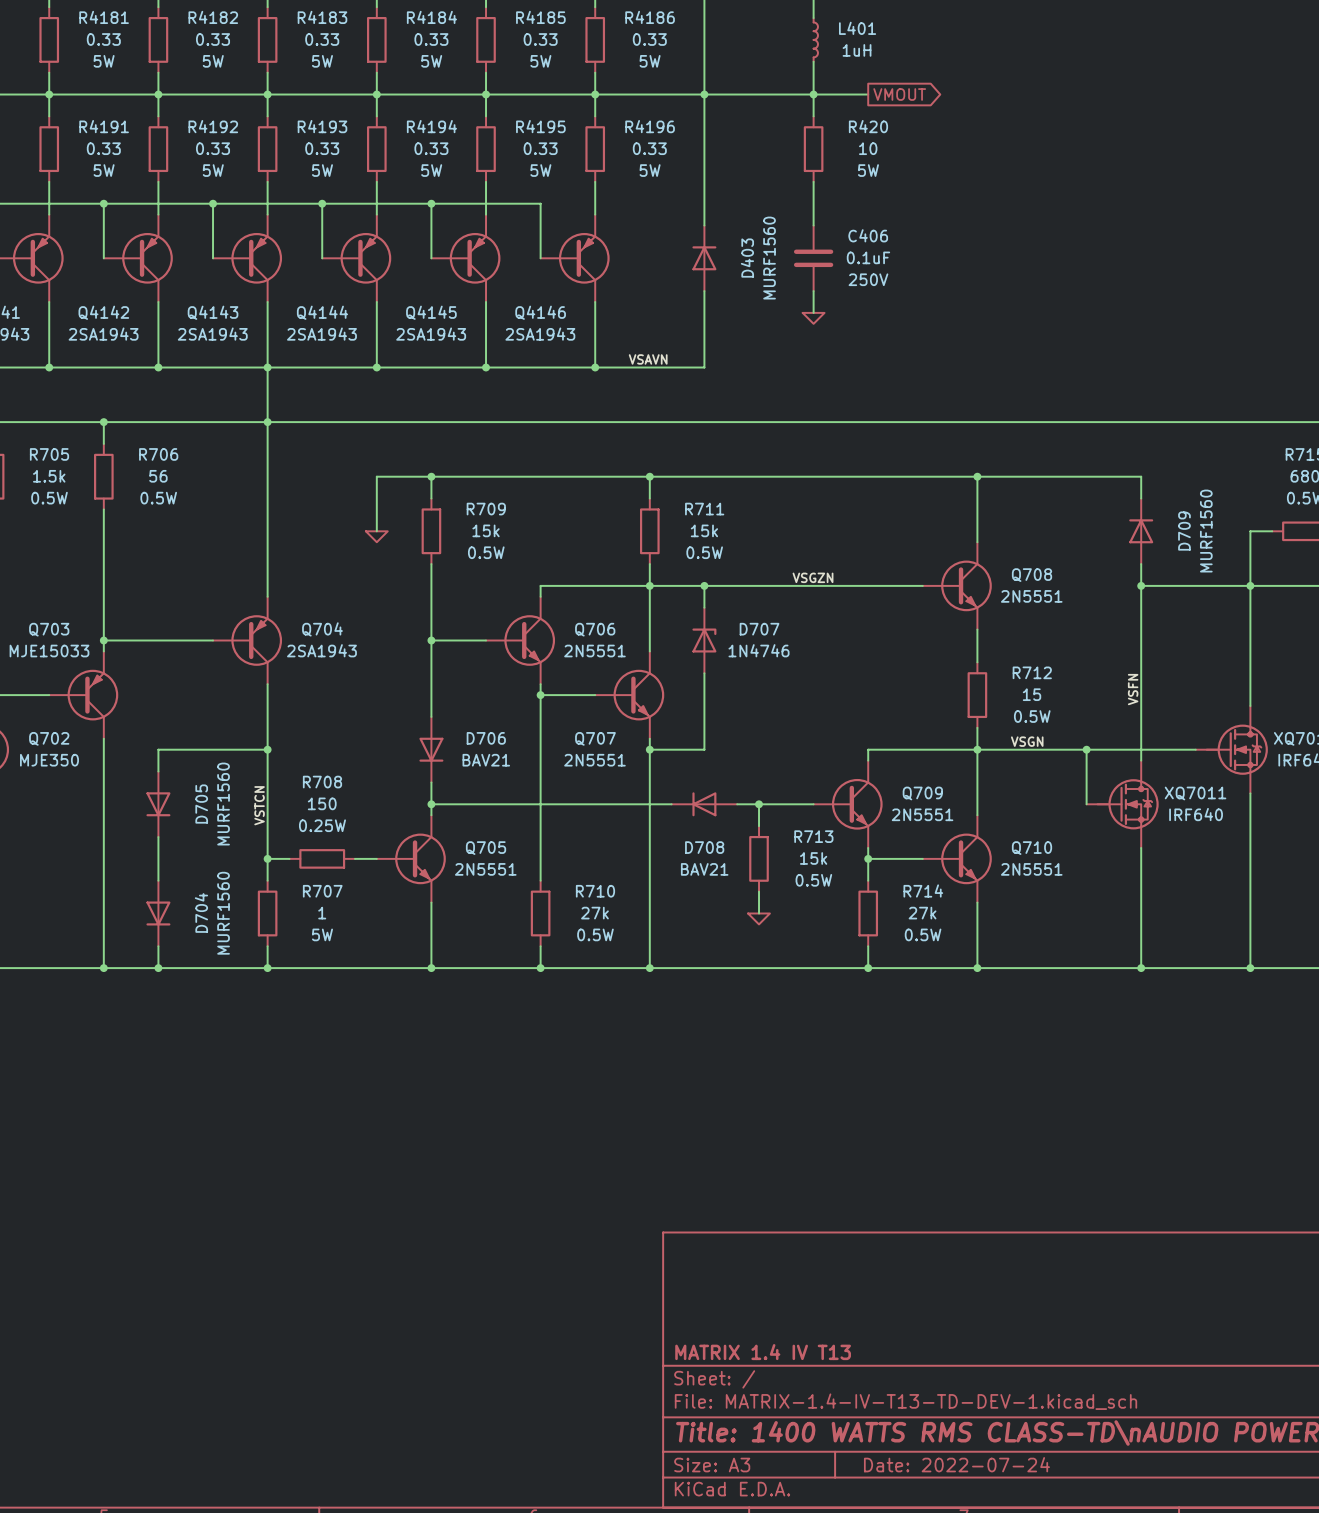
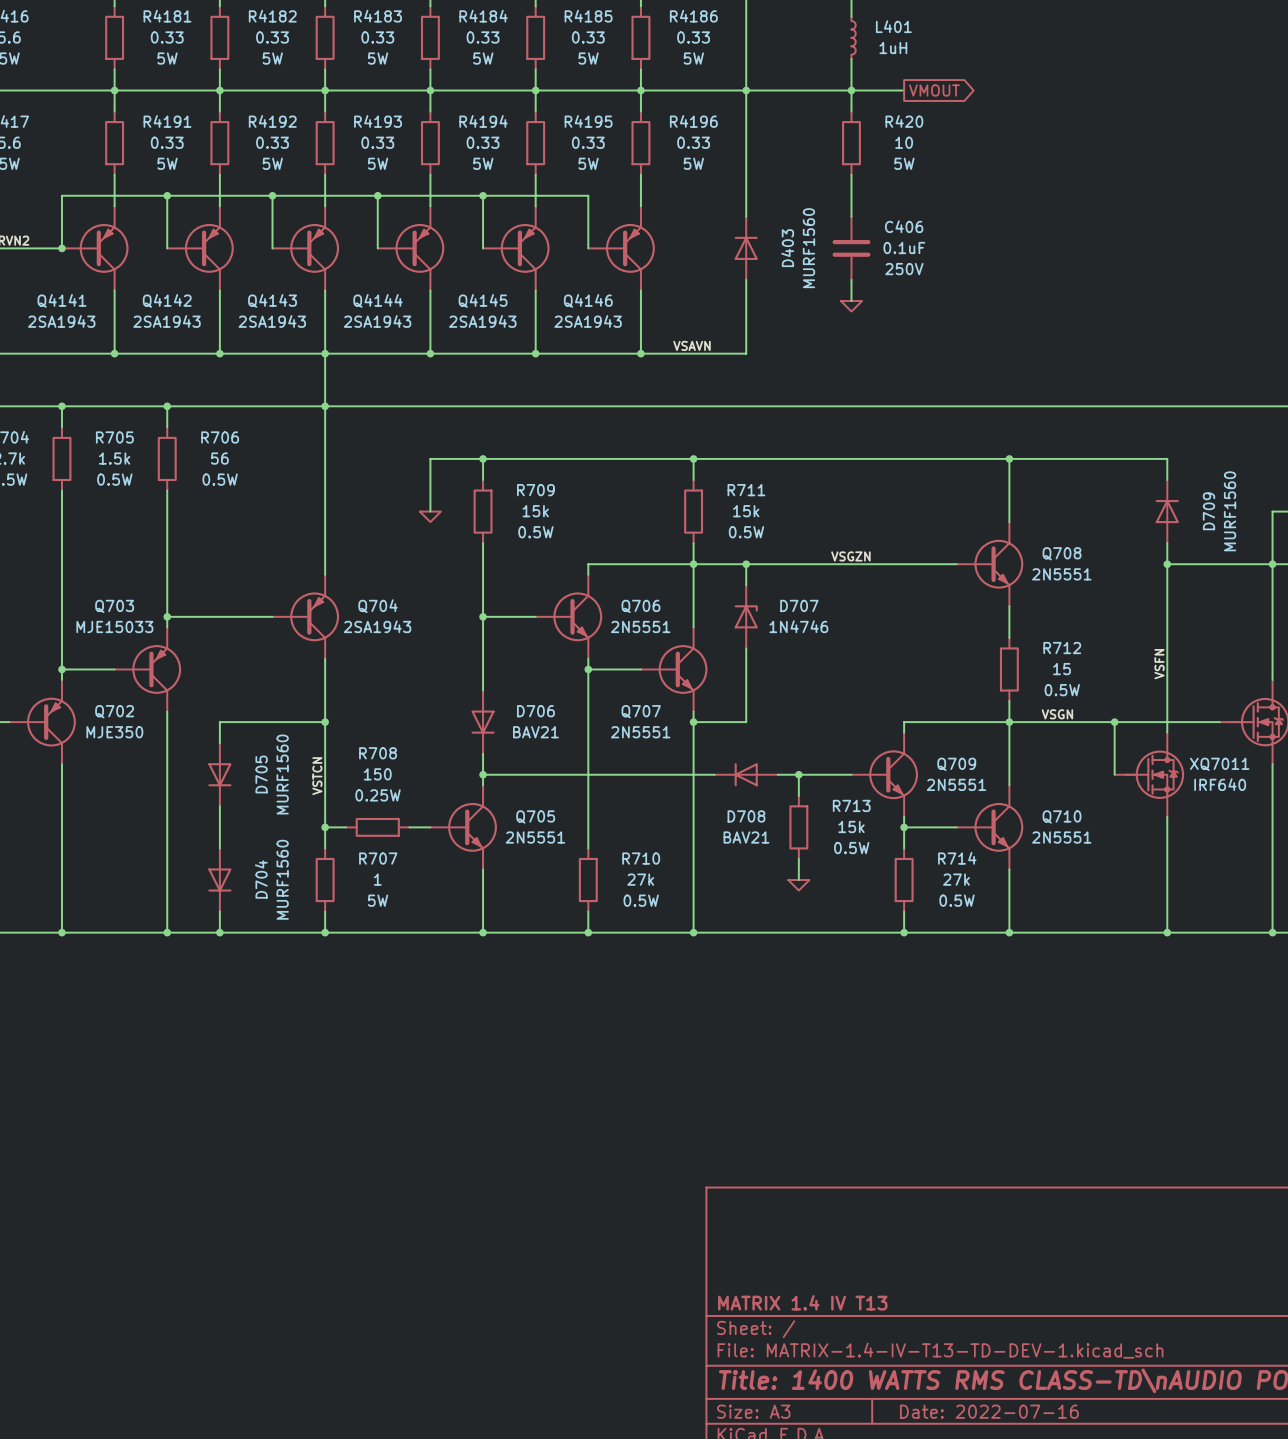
title block: Date: 2022-07-24 (956, 1464) -> Date: 2022-07-16 (989, 1411)

